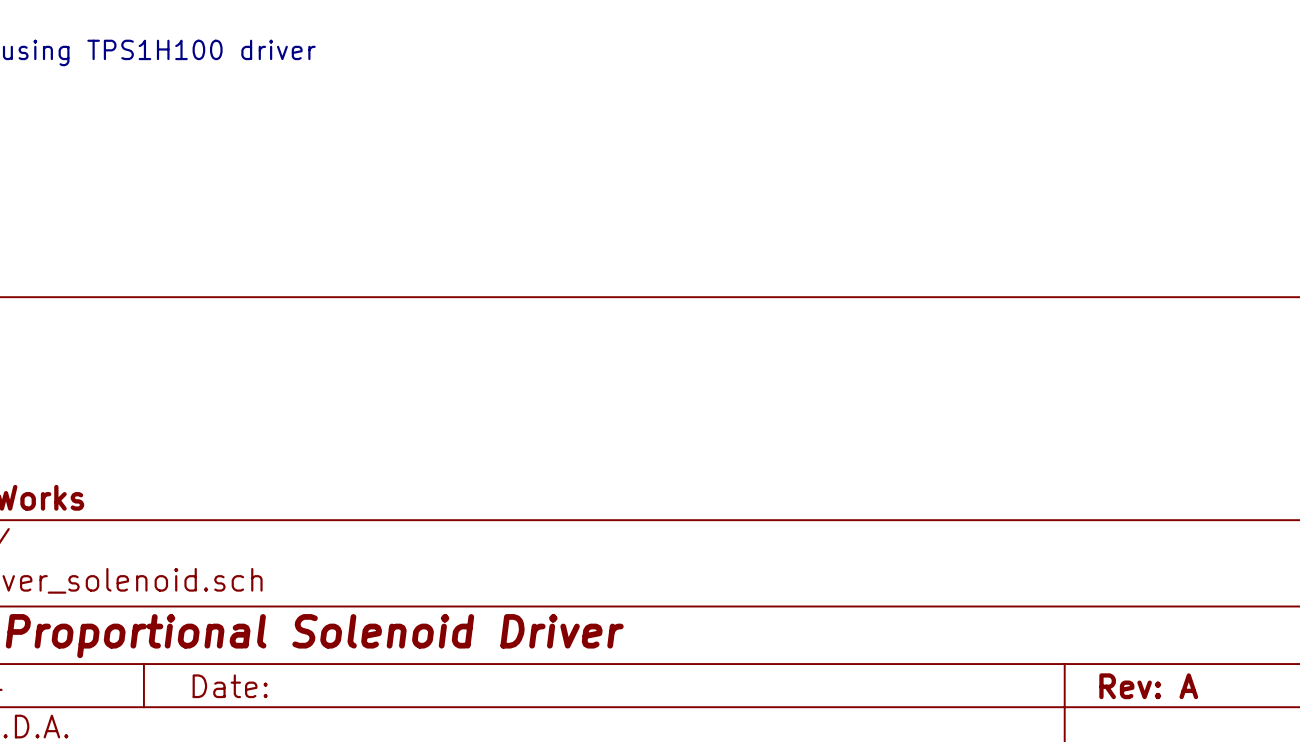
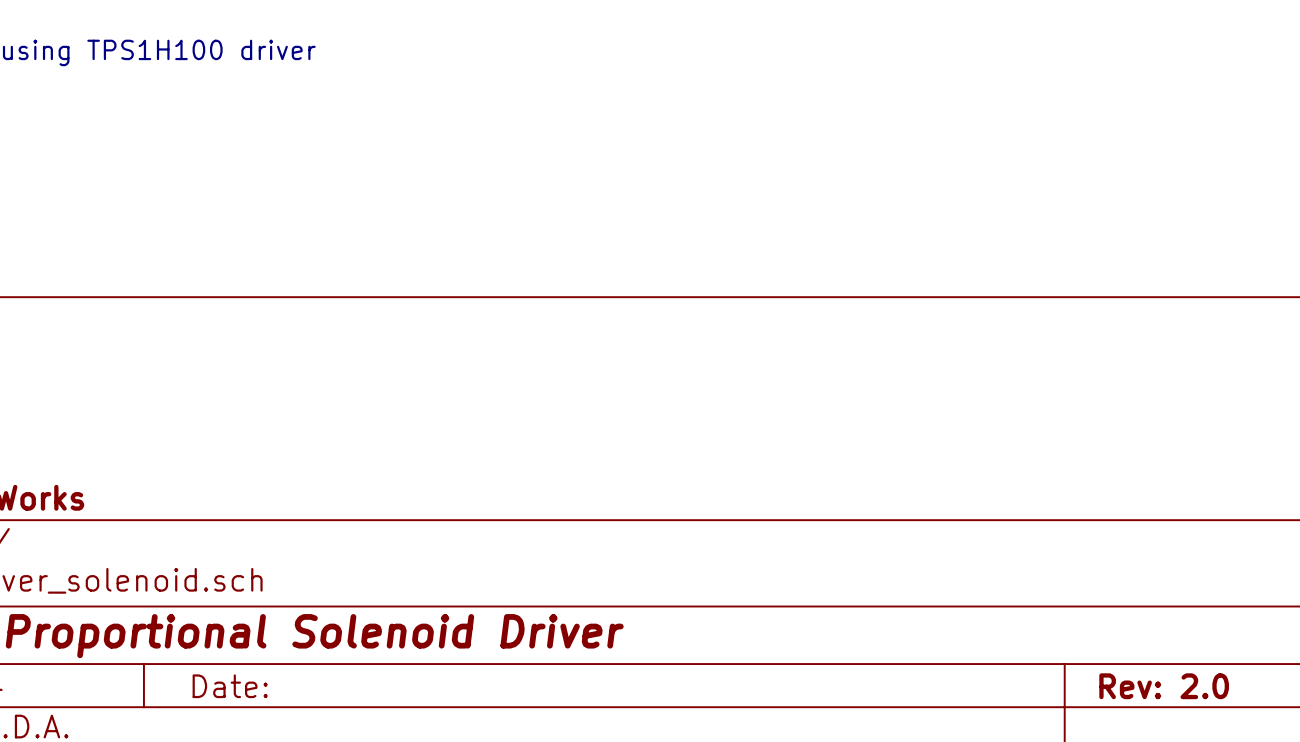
title block: Rev: A (1148, 686) -> Rev: 2.0 (1164, 686)

